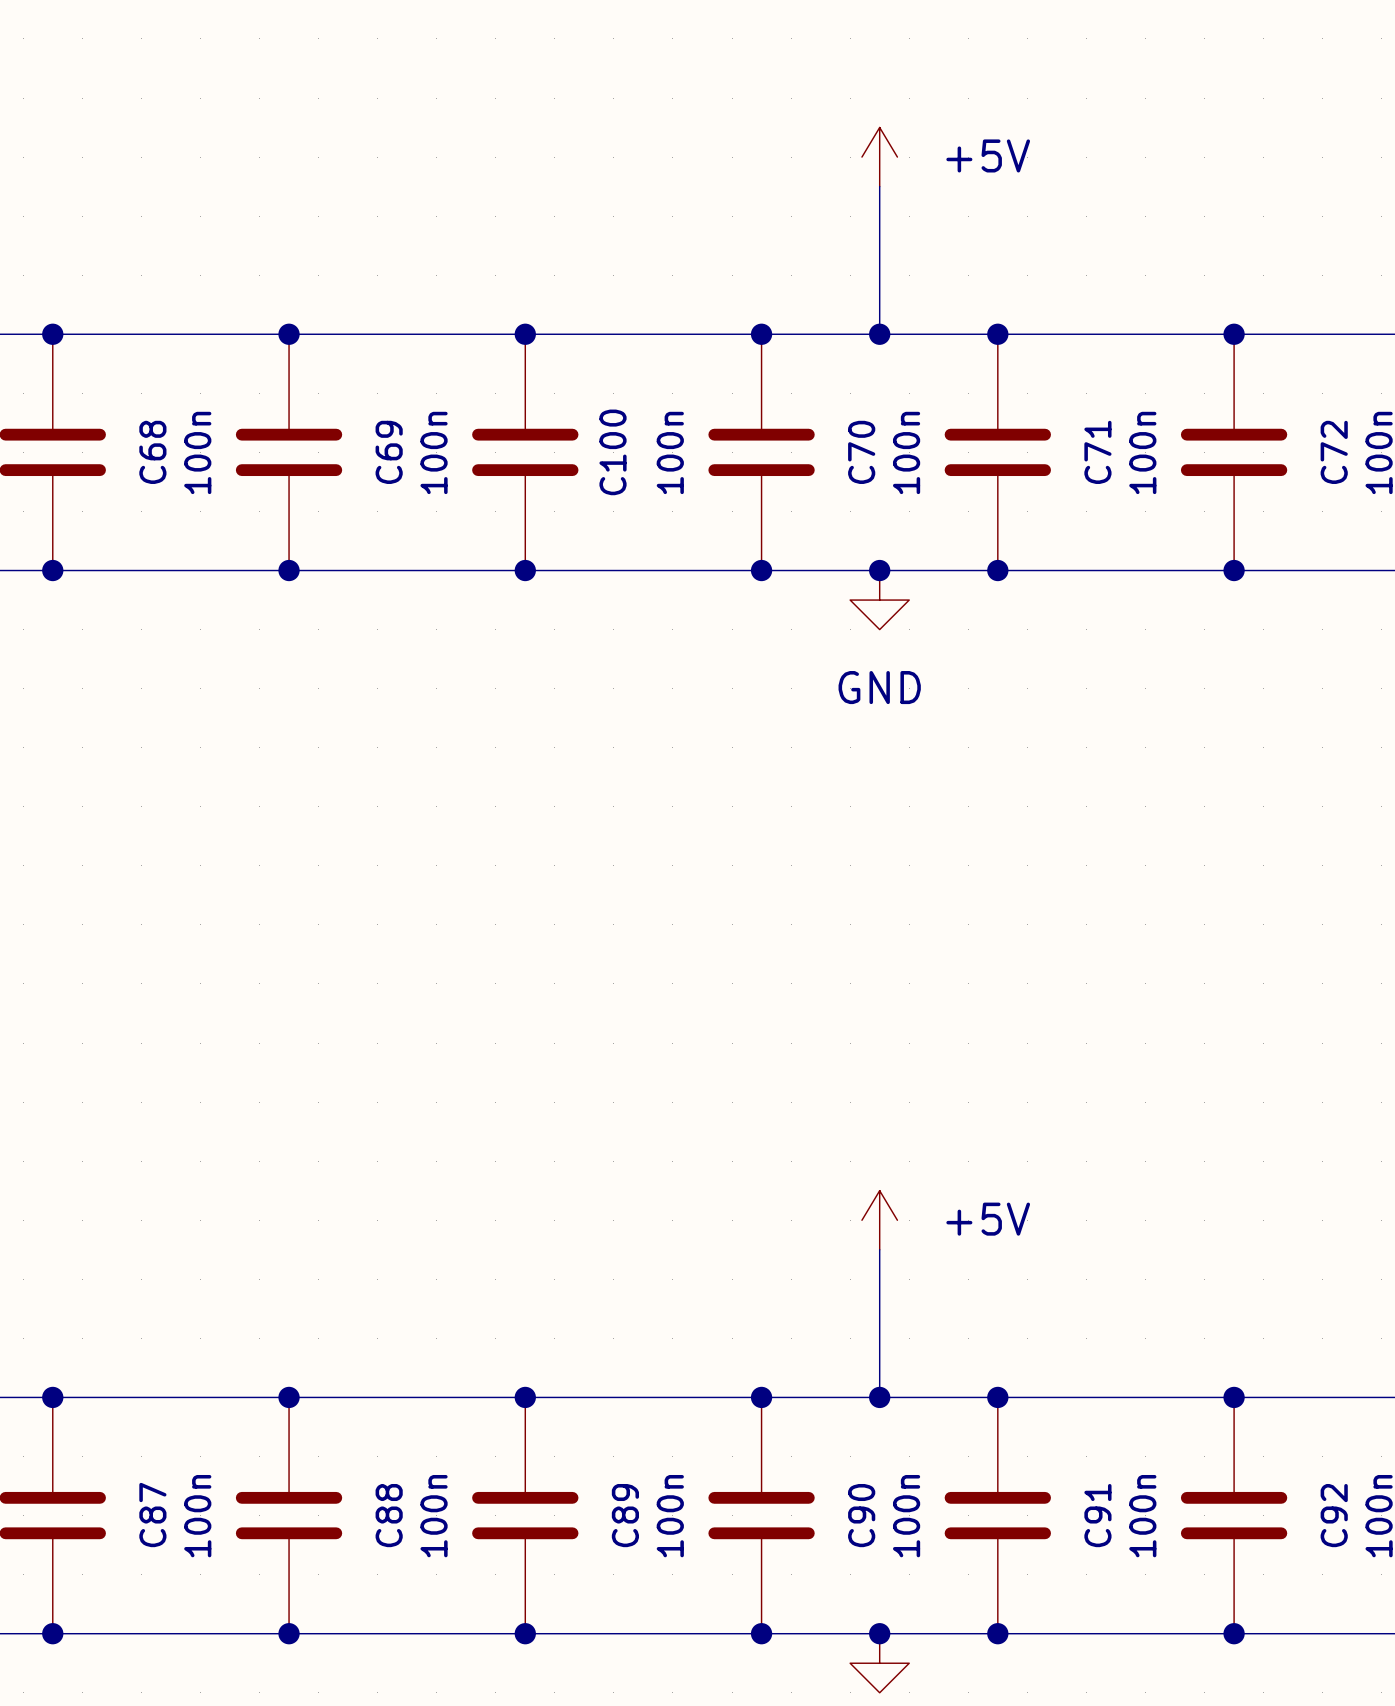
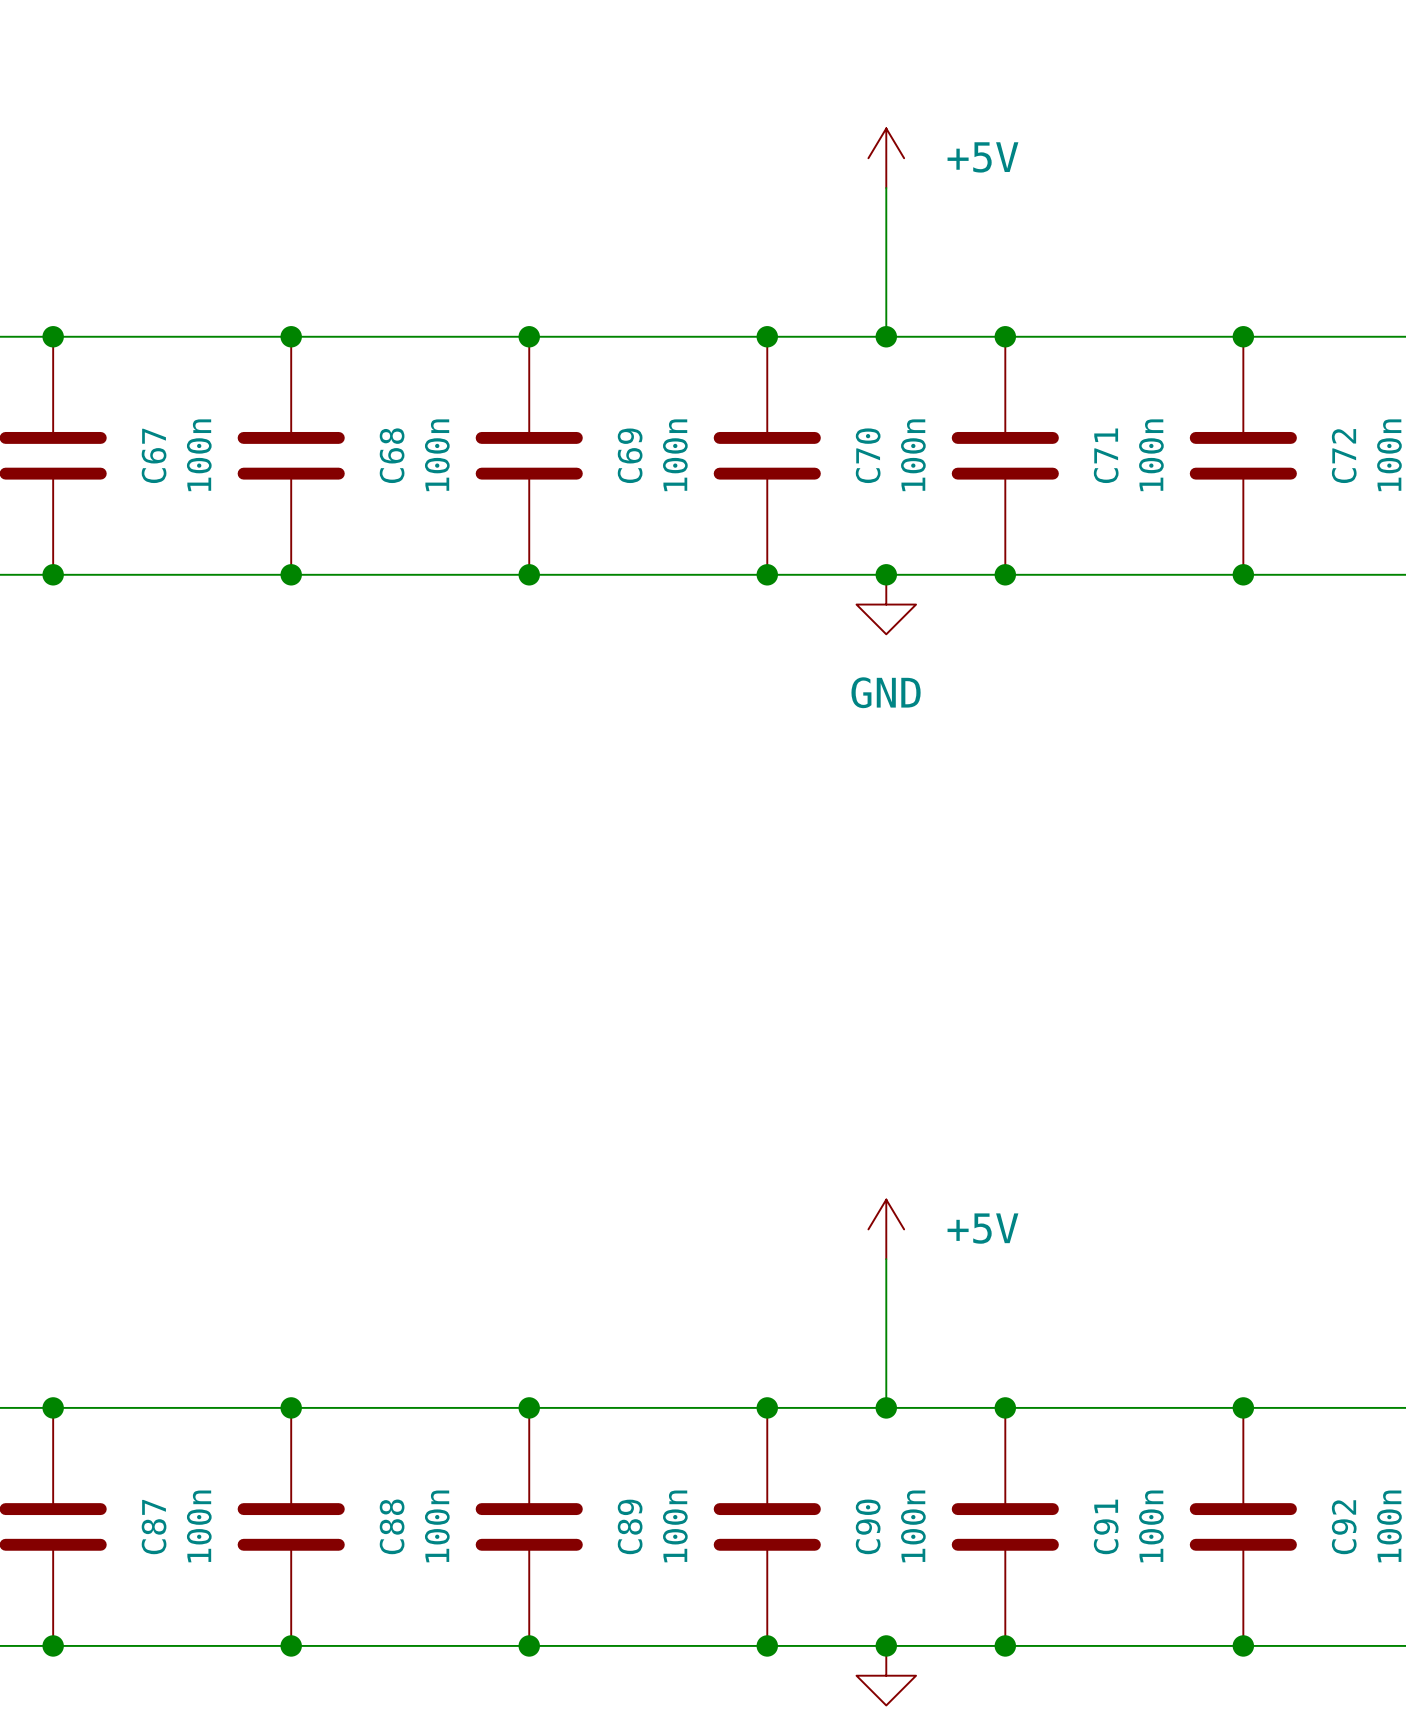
C68 name: C68 (152, 452) -> C67 (154, 455)
C69 name: C69 (389, 452) -> C68 (392, 455)
C100 name: C100 (613, 452) -> C69 (630, 455)

